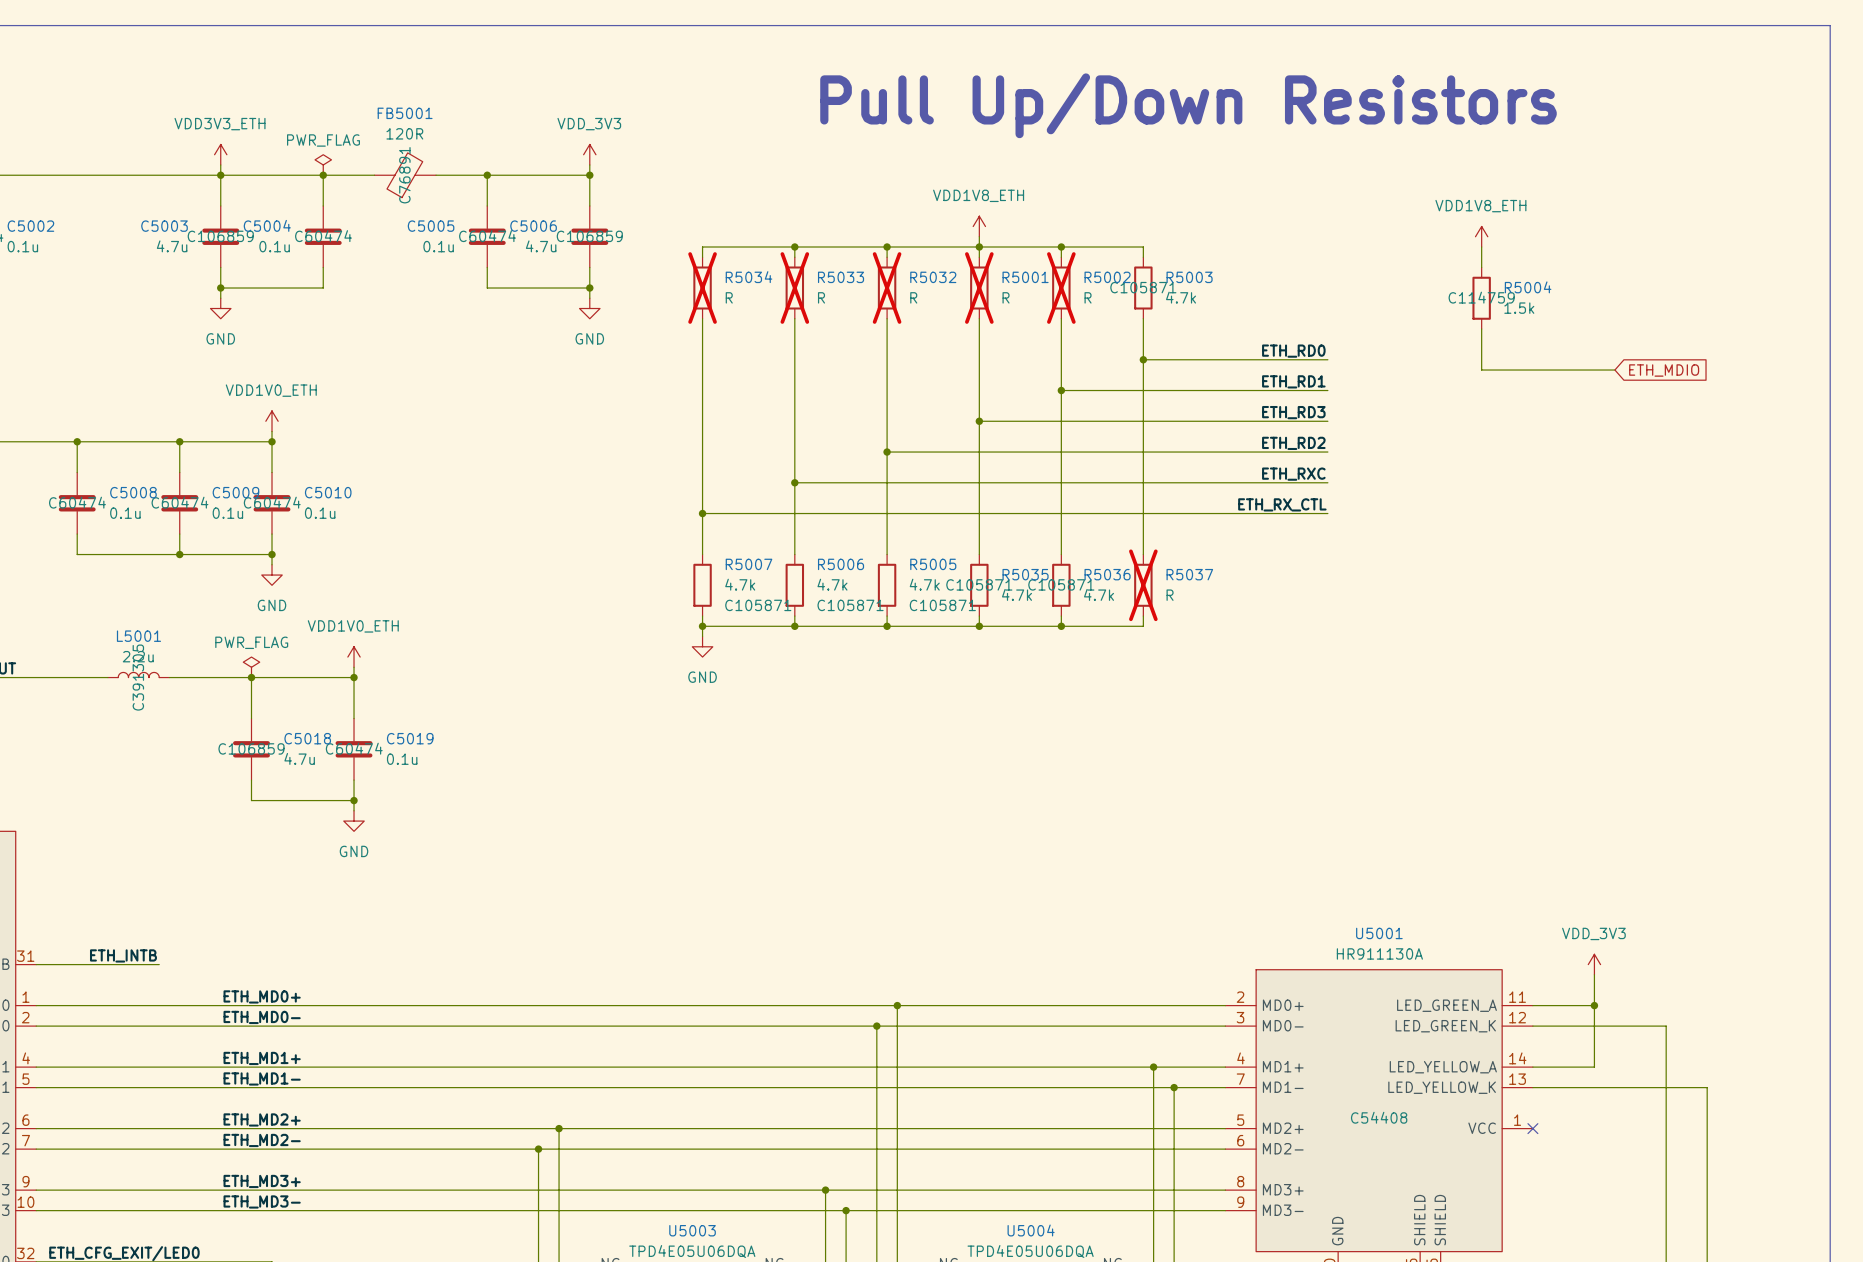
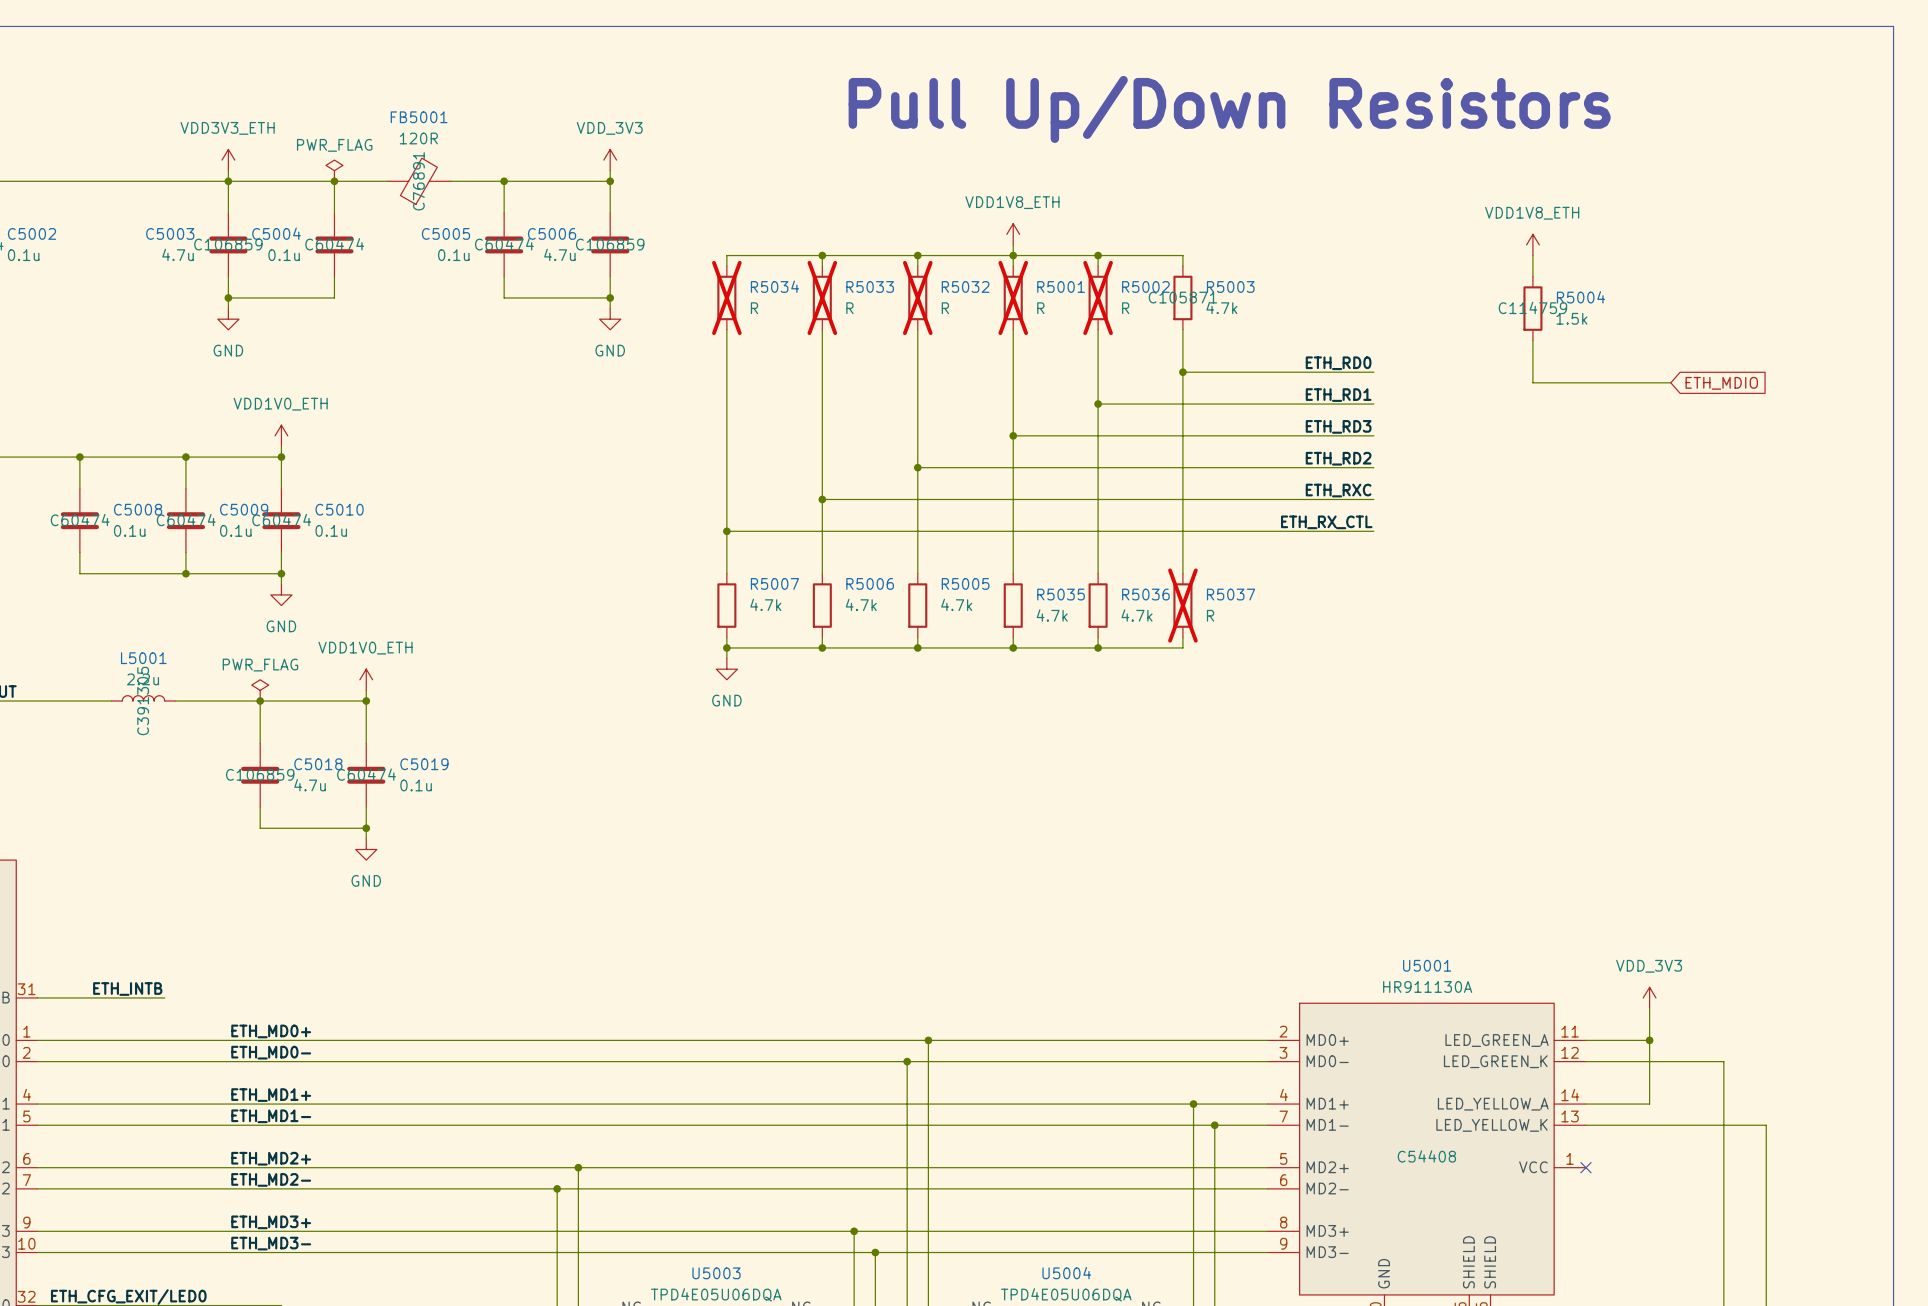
R5035 text: C105871 (979, 584) -> none
R5036 text: C105871 (1061, 584) -> none
R5007 text: C105871 (758, 605) -> none
R5006 text: C105871 (850, 605) -> none
R5005 text: C105871 (942, 605) -> none

